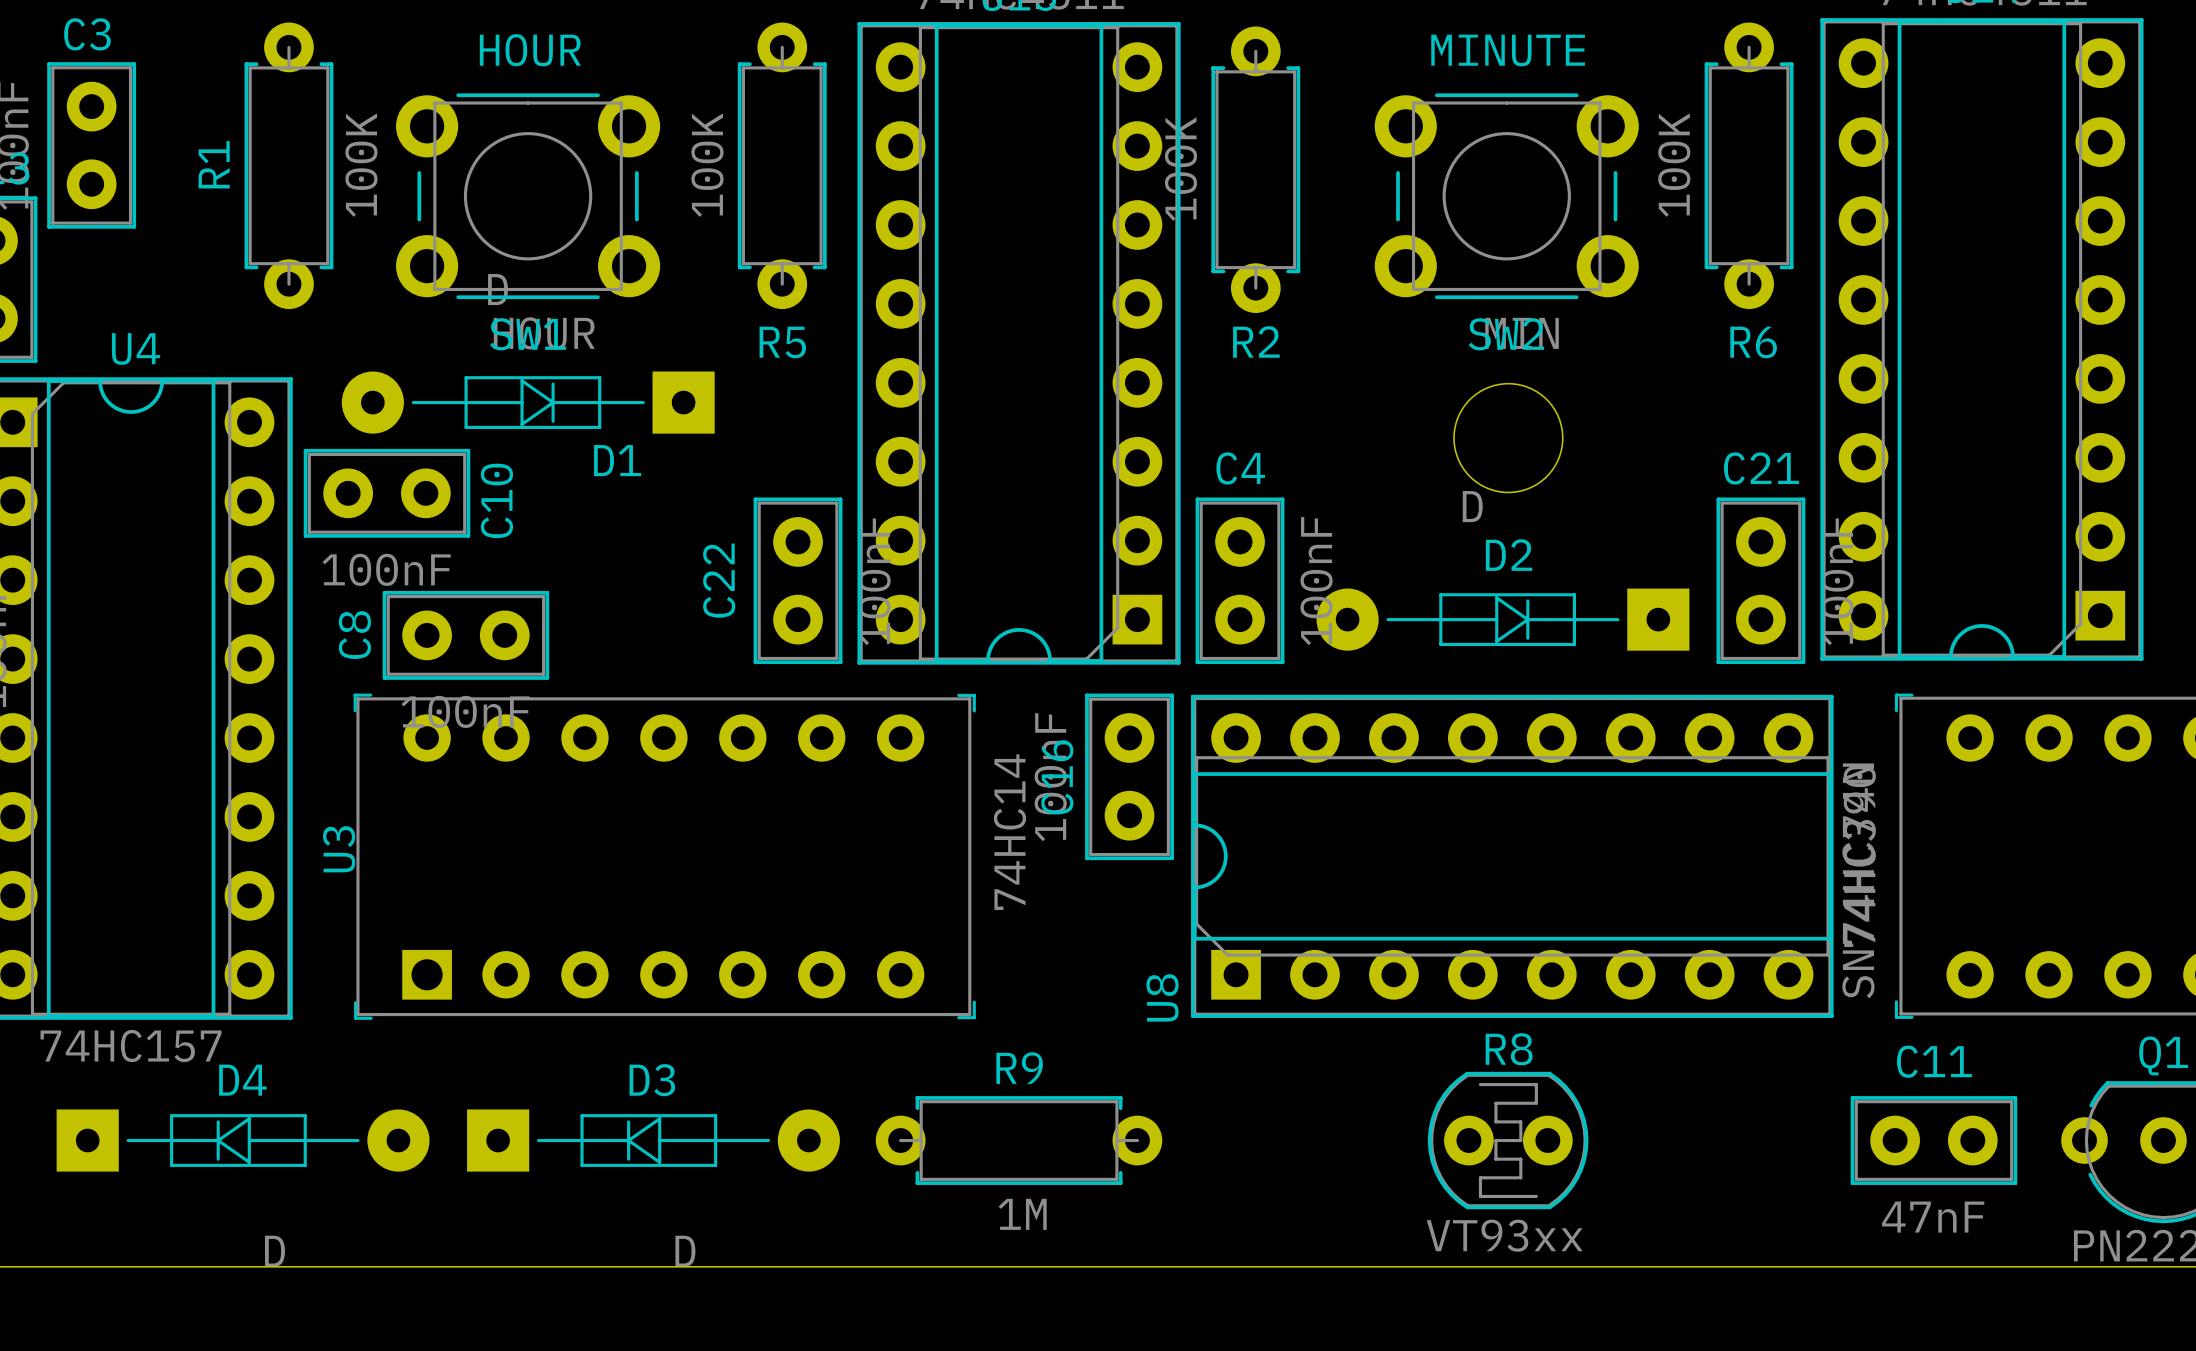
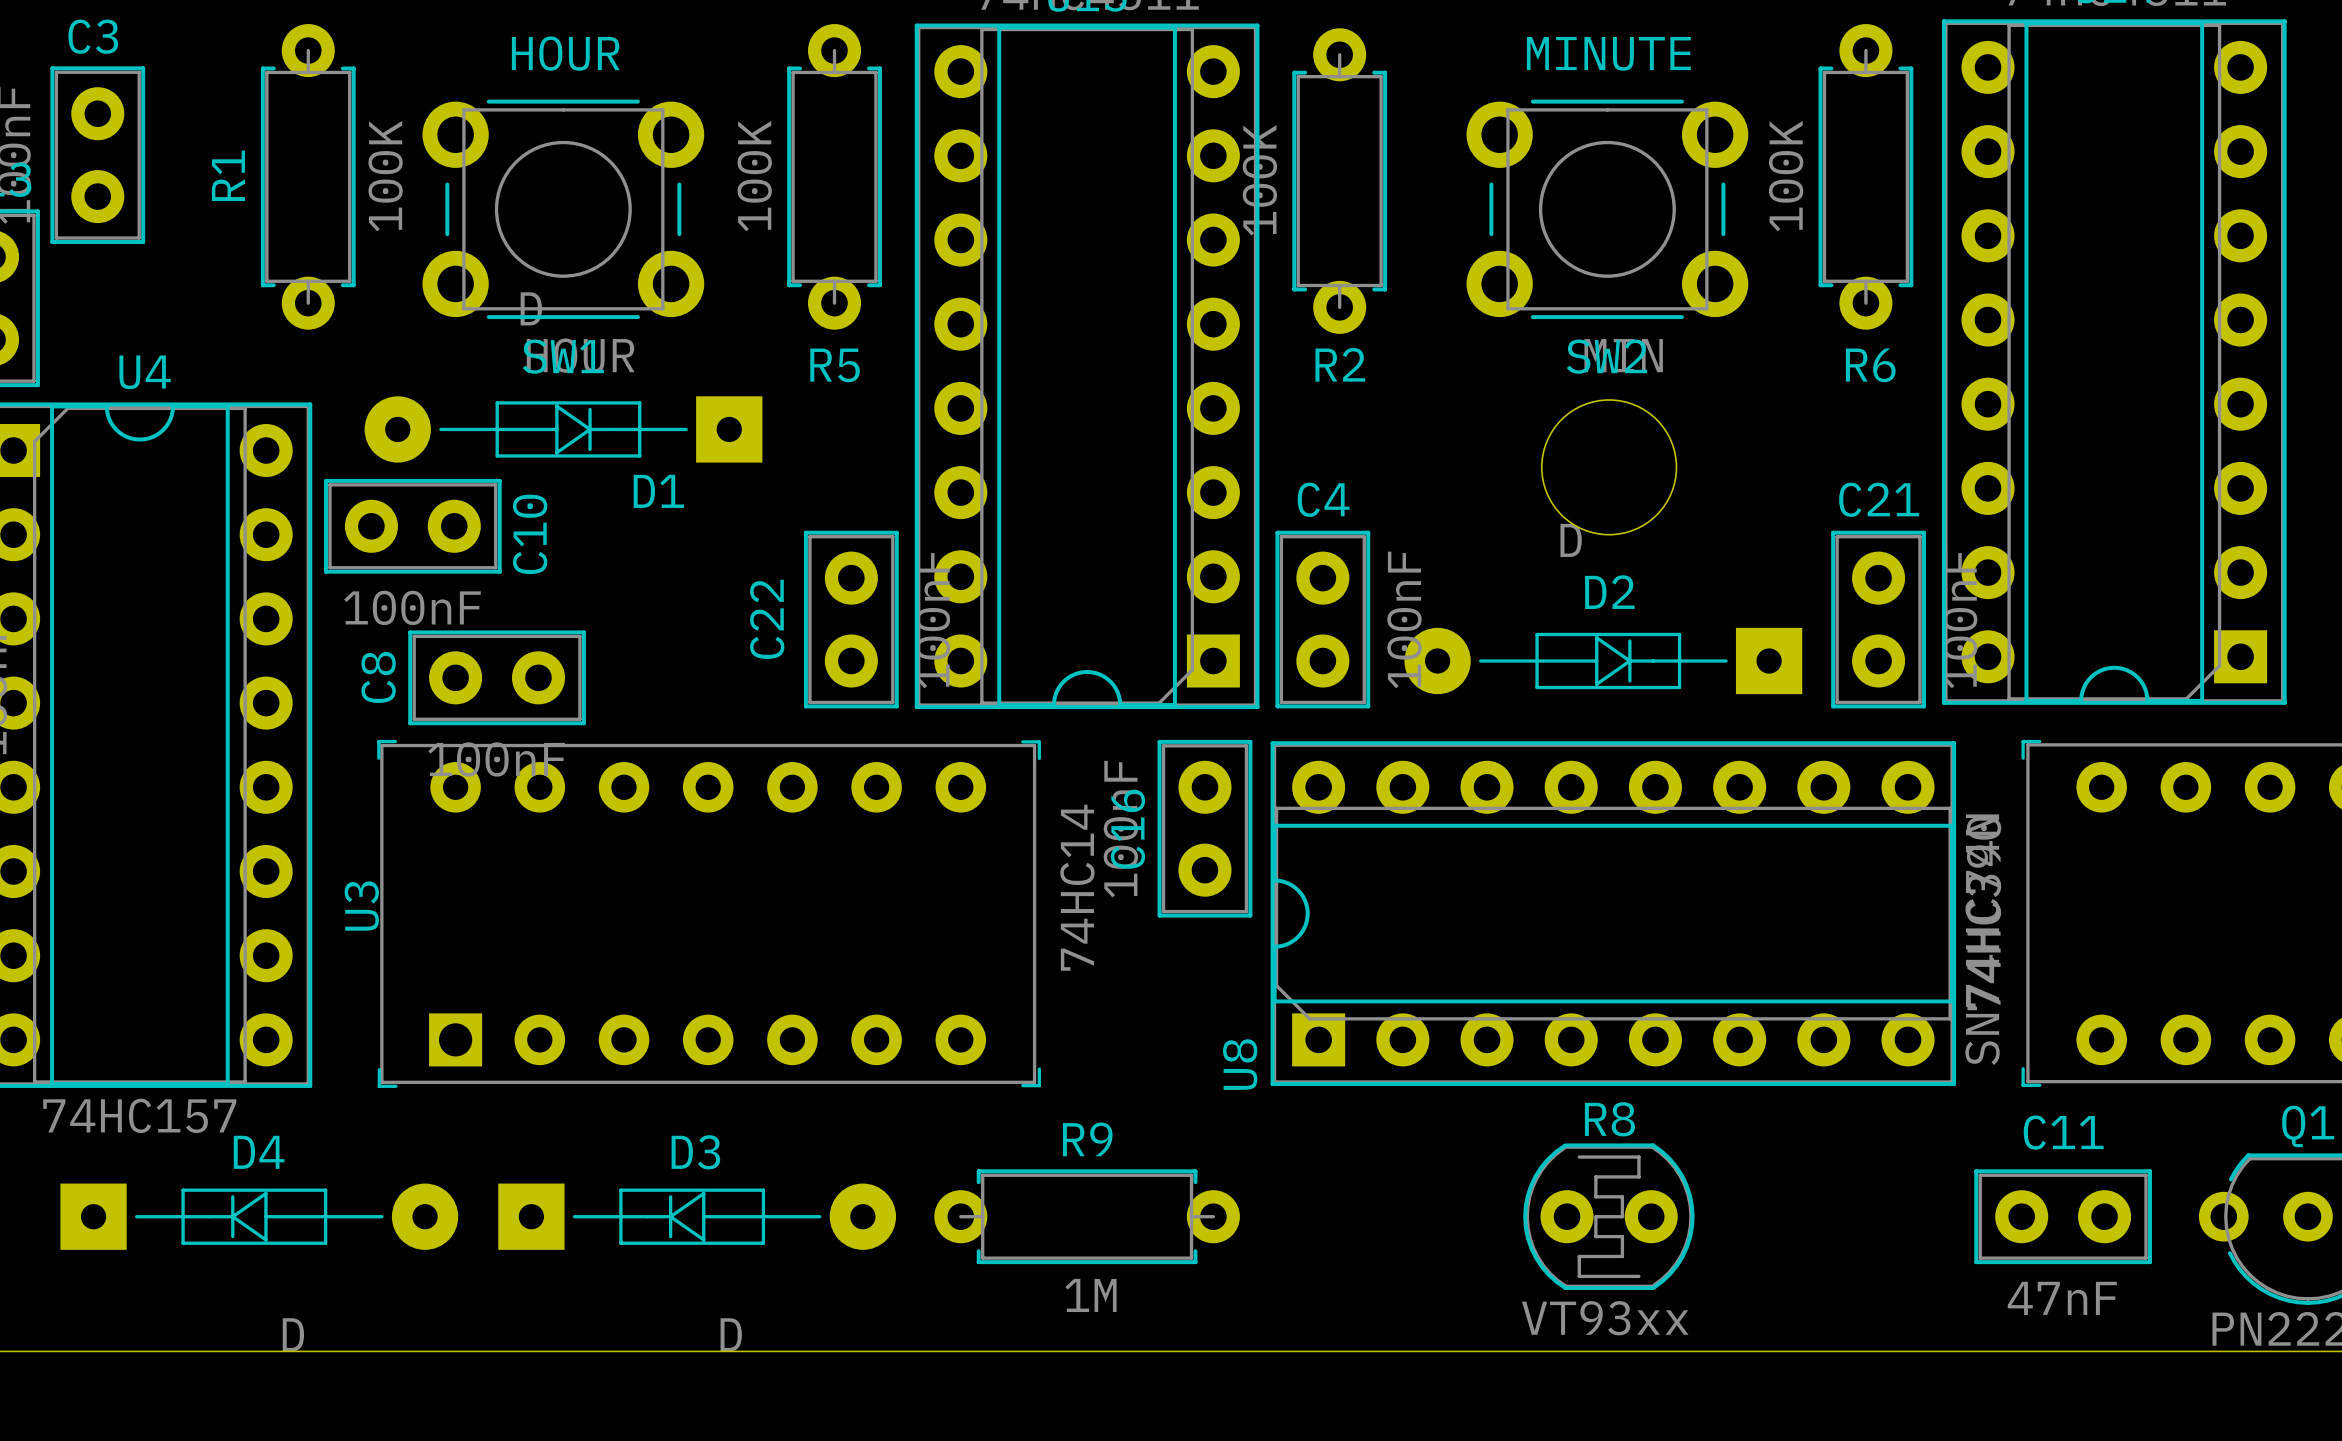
round board edge size: [1453, 382, 1564, 494] -> [1540, 399, 1678, 536]

